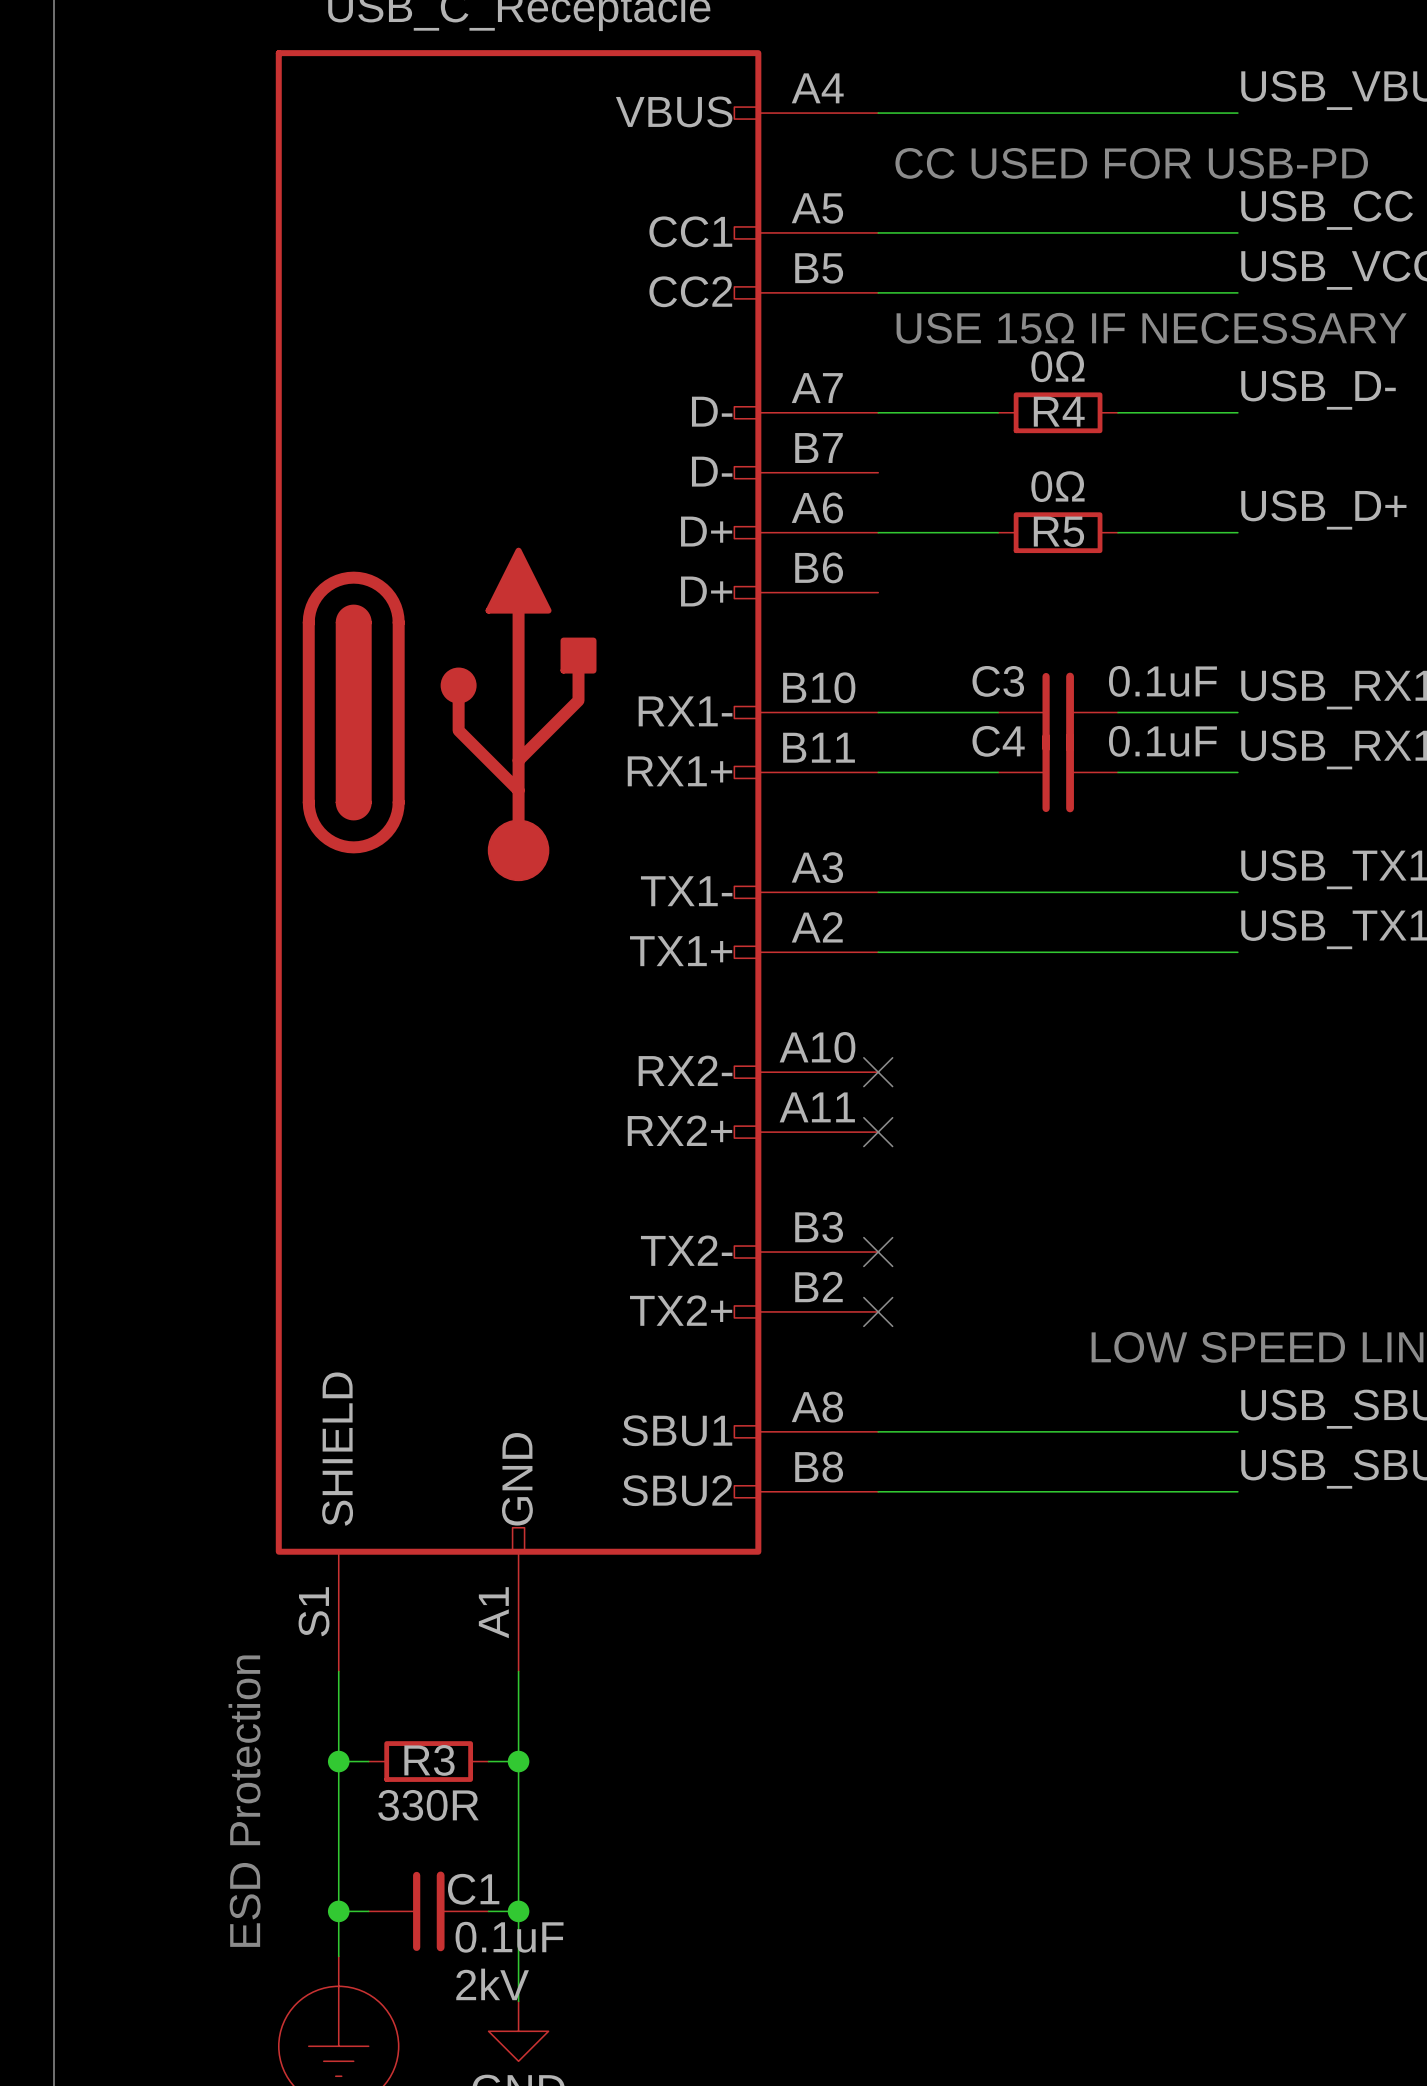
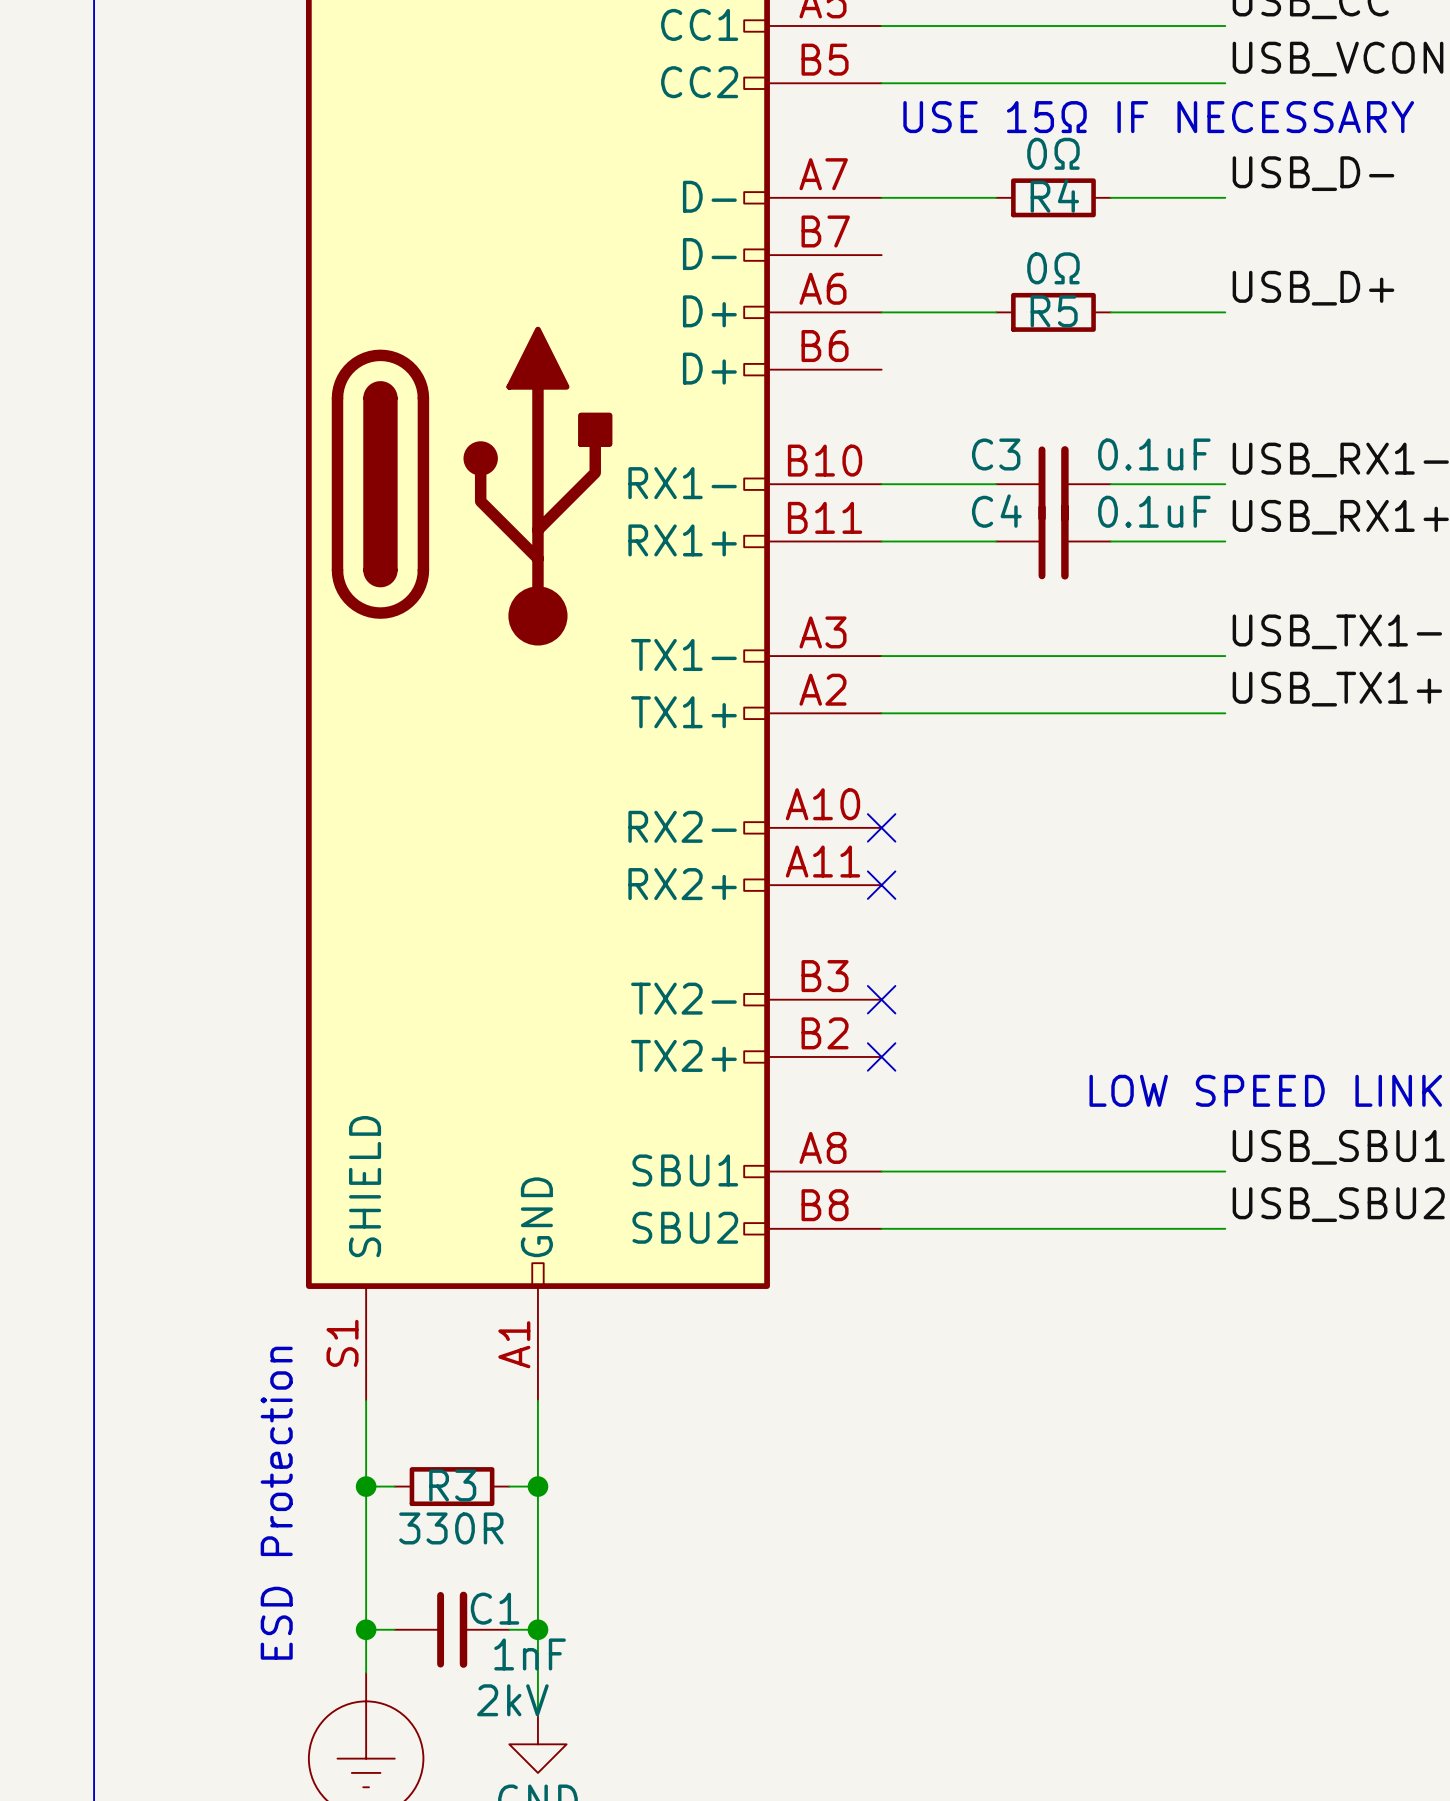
C1 value: 0.1uF (509, 1937) -> 1nF (530, 1654)

